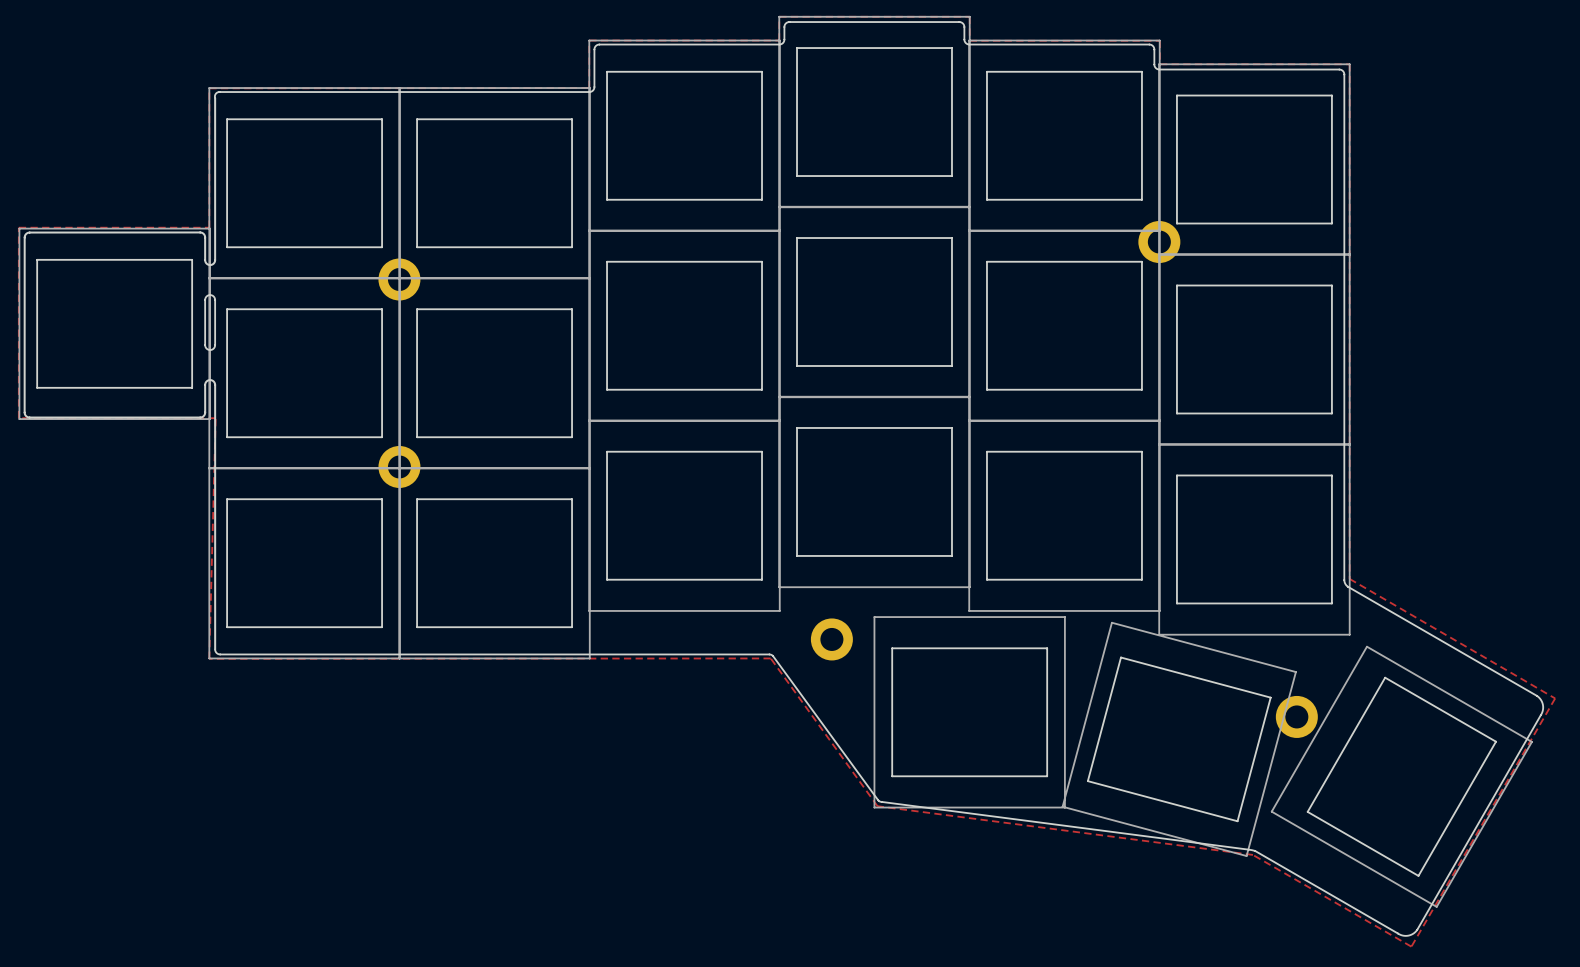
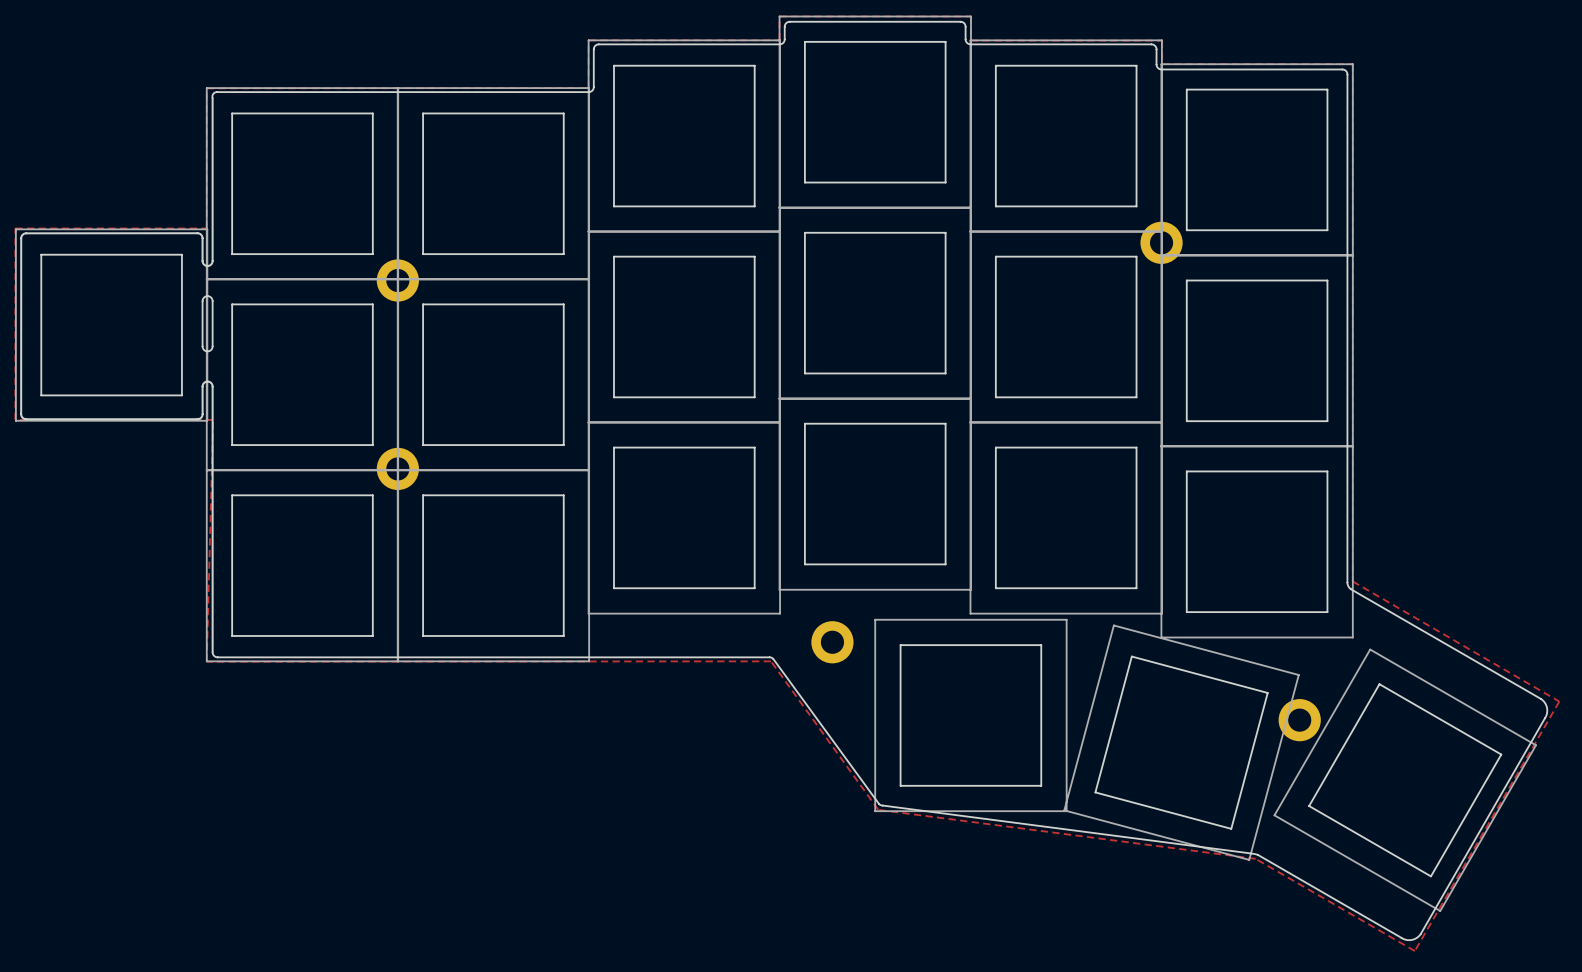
drawing shape: [778, 16, 971, 209] -> [778, 15, 972, 209]
drawing shape: [588, 39, 781, 232] -> [587, 39, 781, 233]
drawing shape: [968, 39, 1161, 232] -> [969, 39, 1163, 233]
drawing shape: [1158, 63, 1351, 256] -> [1160, 63, 1354, 257]
drawing shape: [208, 87, 401, 280] -> [206, 87, 399, 281]
drawing shape: [398, 87, 591, 280] -> [396, 87, 590, 281]
drawing shape: [778, 206, 971, 398] -> [778, 206, 972, 400]
drawing shape: [18, 227, 211, 420] -> [15, 228, 209, 422]
drawing shape: [588, 229, 781, 422] -> [587, 230, 781, 424]
drawing shape: [968, 229, 1161, 422] -> [969, 230, 1163, 424]
drawing shape: [1158, 253, 1351, 446] -> [1160, 254, 1354, 448]
drawing shape: [208, 277, 401, 470] -> [206, 278, 399, 472]
drawing shape: [398, 277, 591, 470] -> [396, 278, 590, 472]
drawing shape: [778, 395, 971, 588] -> [778, 397, 972, 591]
drawing shape: [588, 419, 781, 612] -> [587, 421, 781, 615]
drawing shape: [968, 419, 1161, 612] -> [969, 421, 1163, 615]
drawing shape: [1158, 443, 1351, 636] -> [1160, 445, 1354, 639]
drawing shape: [208, 467, 401, 660] -> [206, 469, 399, 663]
drawing shape: [398, 467, 591, 660] -> [396, 469, 590, 663]
drawing shape: [873, 616, 1066, 809] -> [874, 619, 1068, 812]
drawing shape: [1061, 621, 1297, 857] -> [1063, 624, 1300, 861]
drawing shape: [1270, 645, 1533, 908] -> [1273, 648, 1537, 912]

